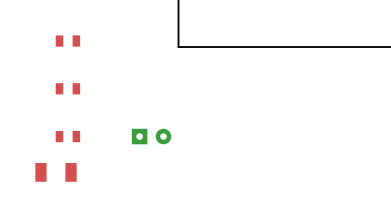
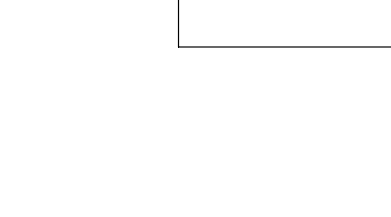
part: (67, 41) -> none
part: (67, 88) -> none
part: (67, 136) -> none
part: (151, 136) -> none
part: (56, 172) -> none

